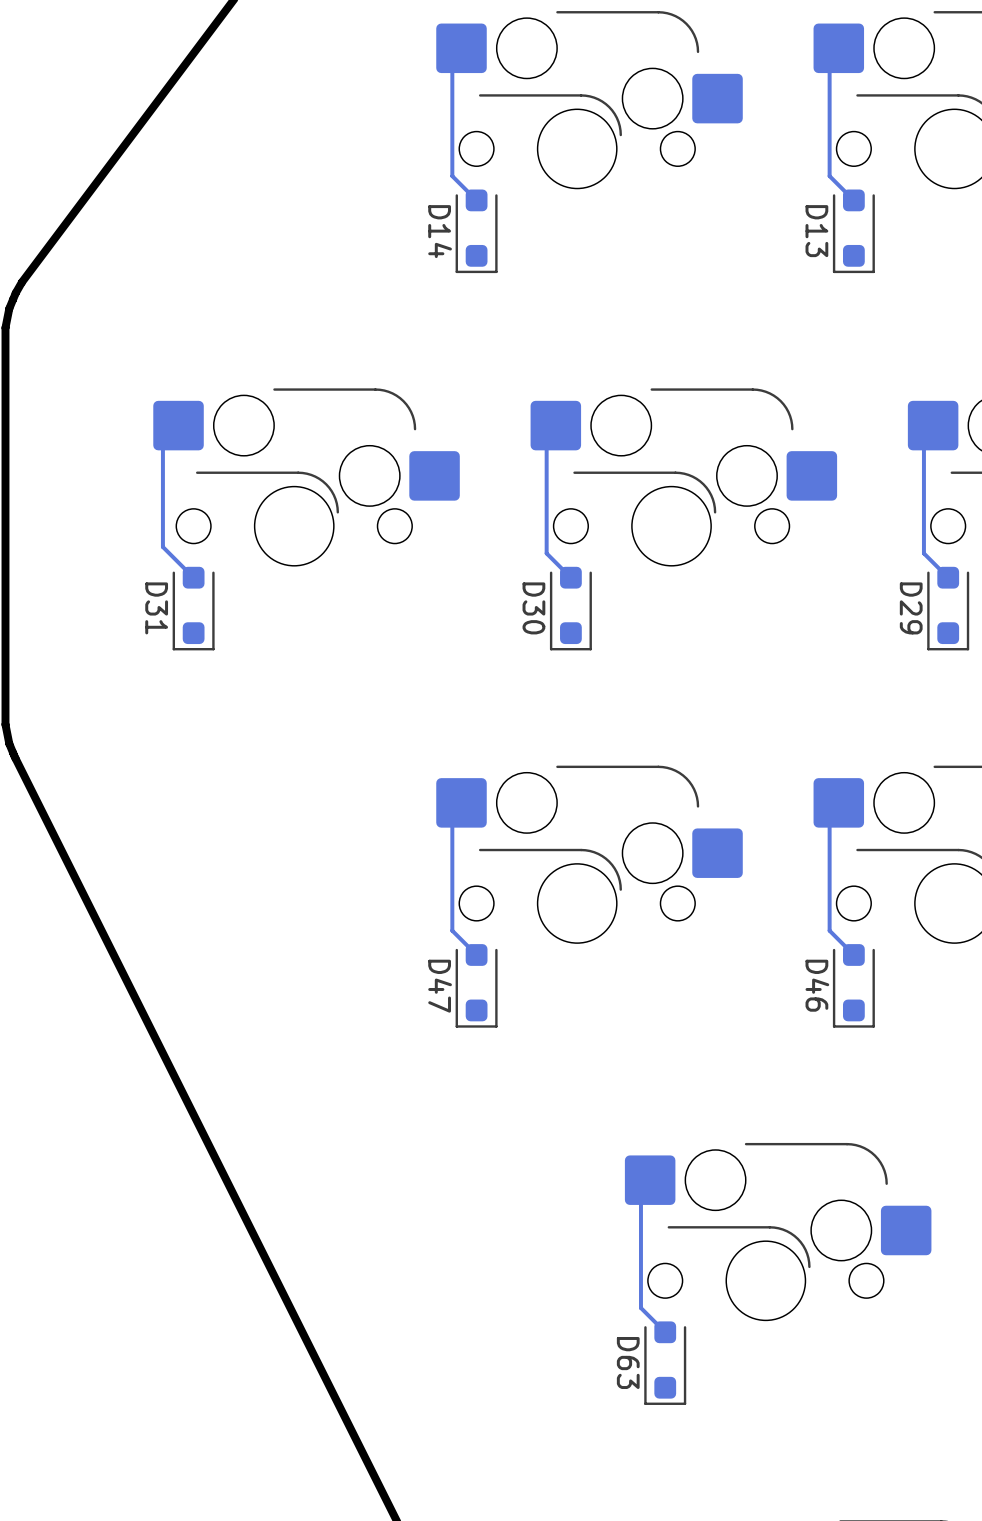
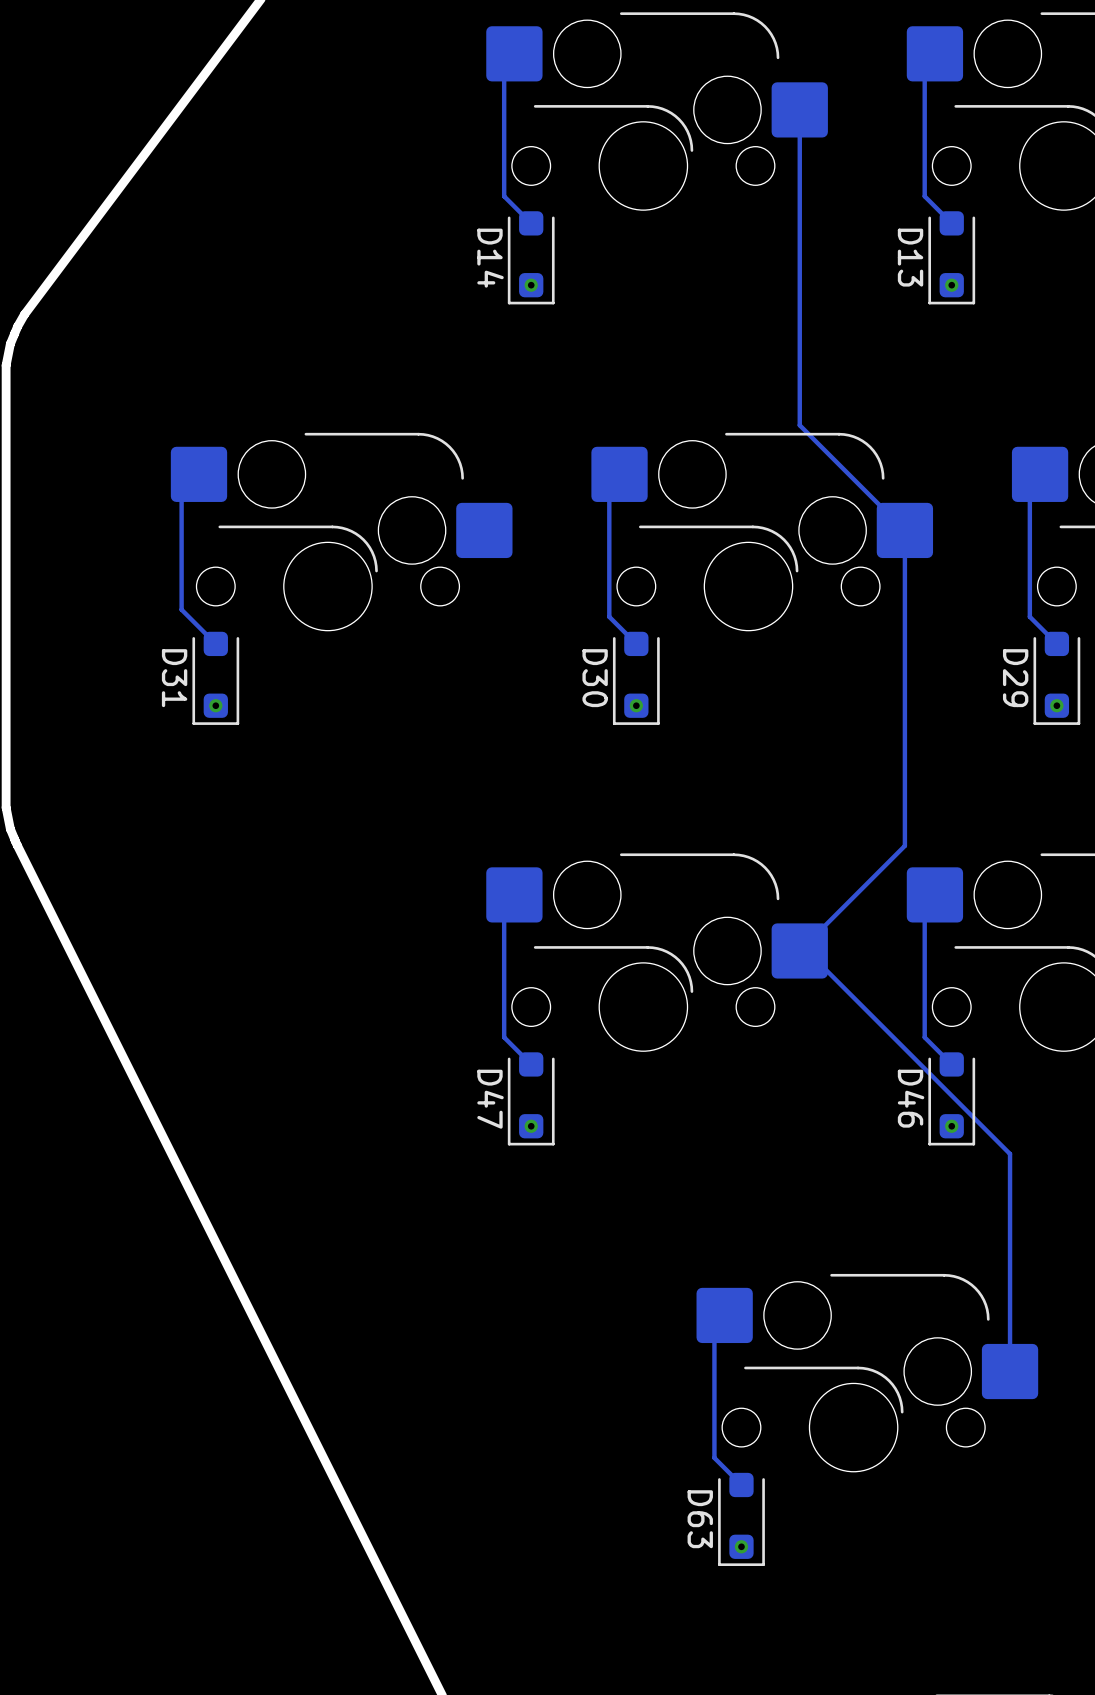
track: none -> (799, 109) (799, 425) (904, 530) (904, 845) (799, 950) (807, 950) (1010, 1153) (1010, 1371)
via: none -> (531, 285)
via: none -> (951, 285)
via: none -> (215, 705)
via: none -> (636, 705)
via: none -> (1056, 705)
via: none -> (531, 1126)
via: none -> (951, 1126)
via: none -> (741, 1546)

